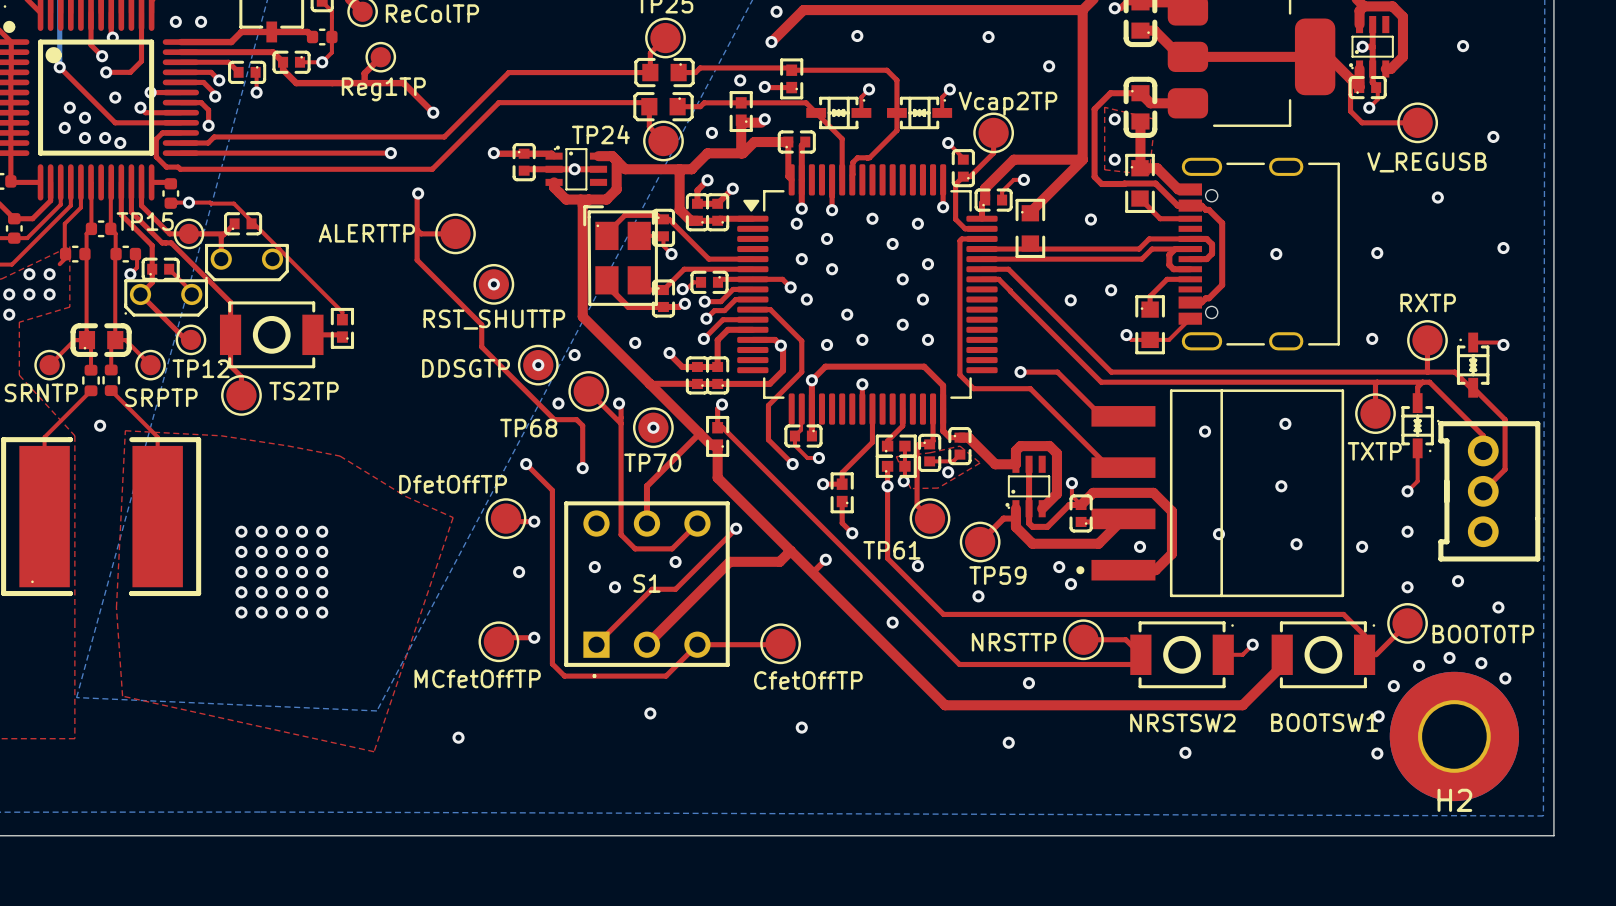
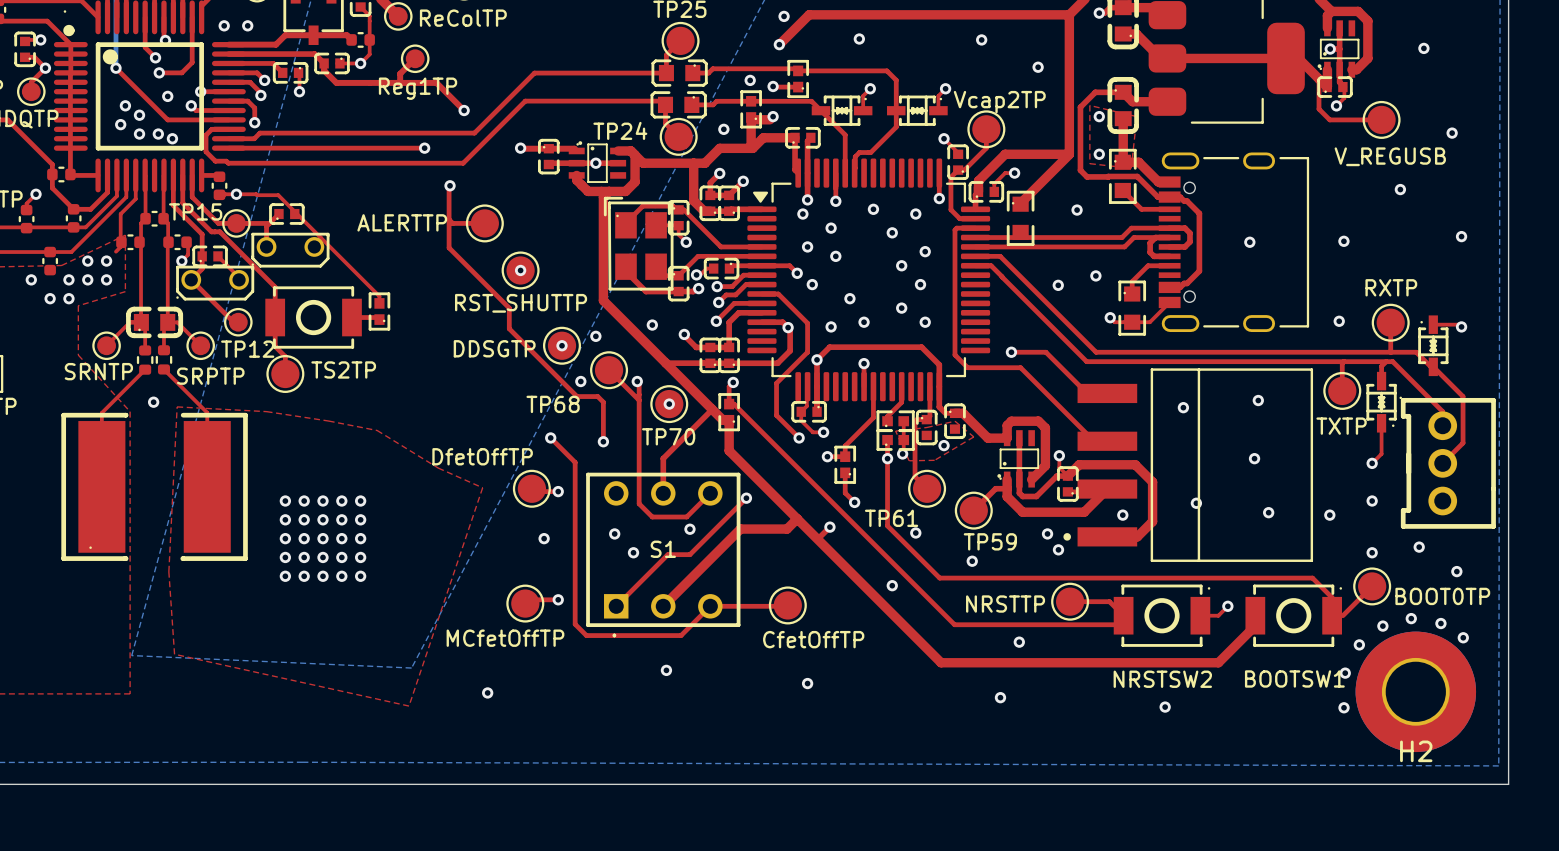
top track: (958, 453) (959, 454) (953, 461) (929, 461) -> none

